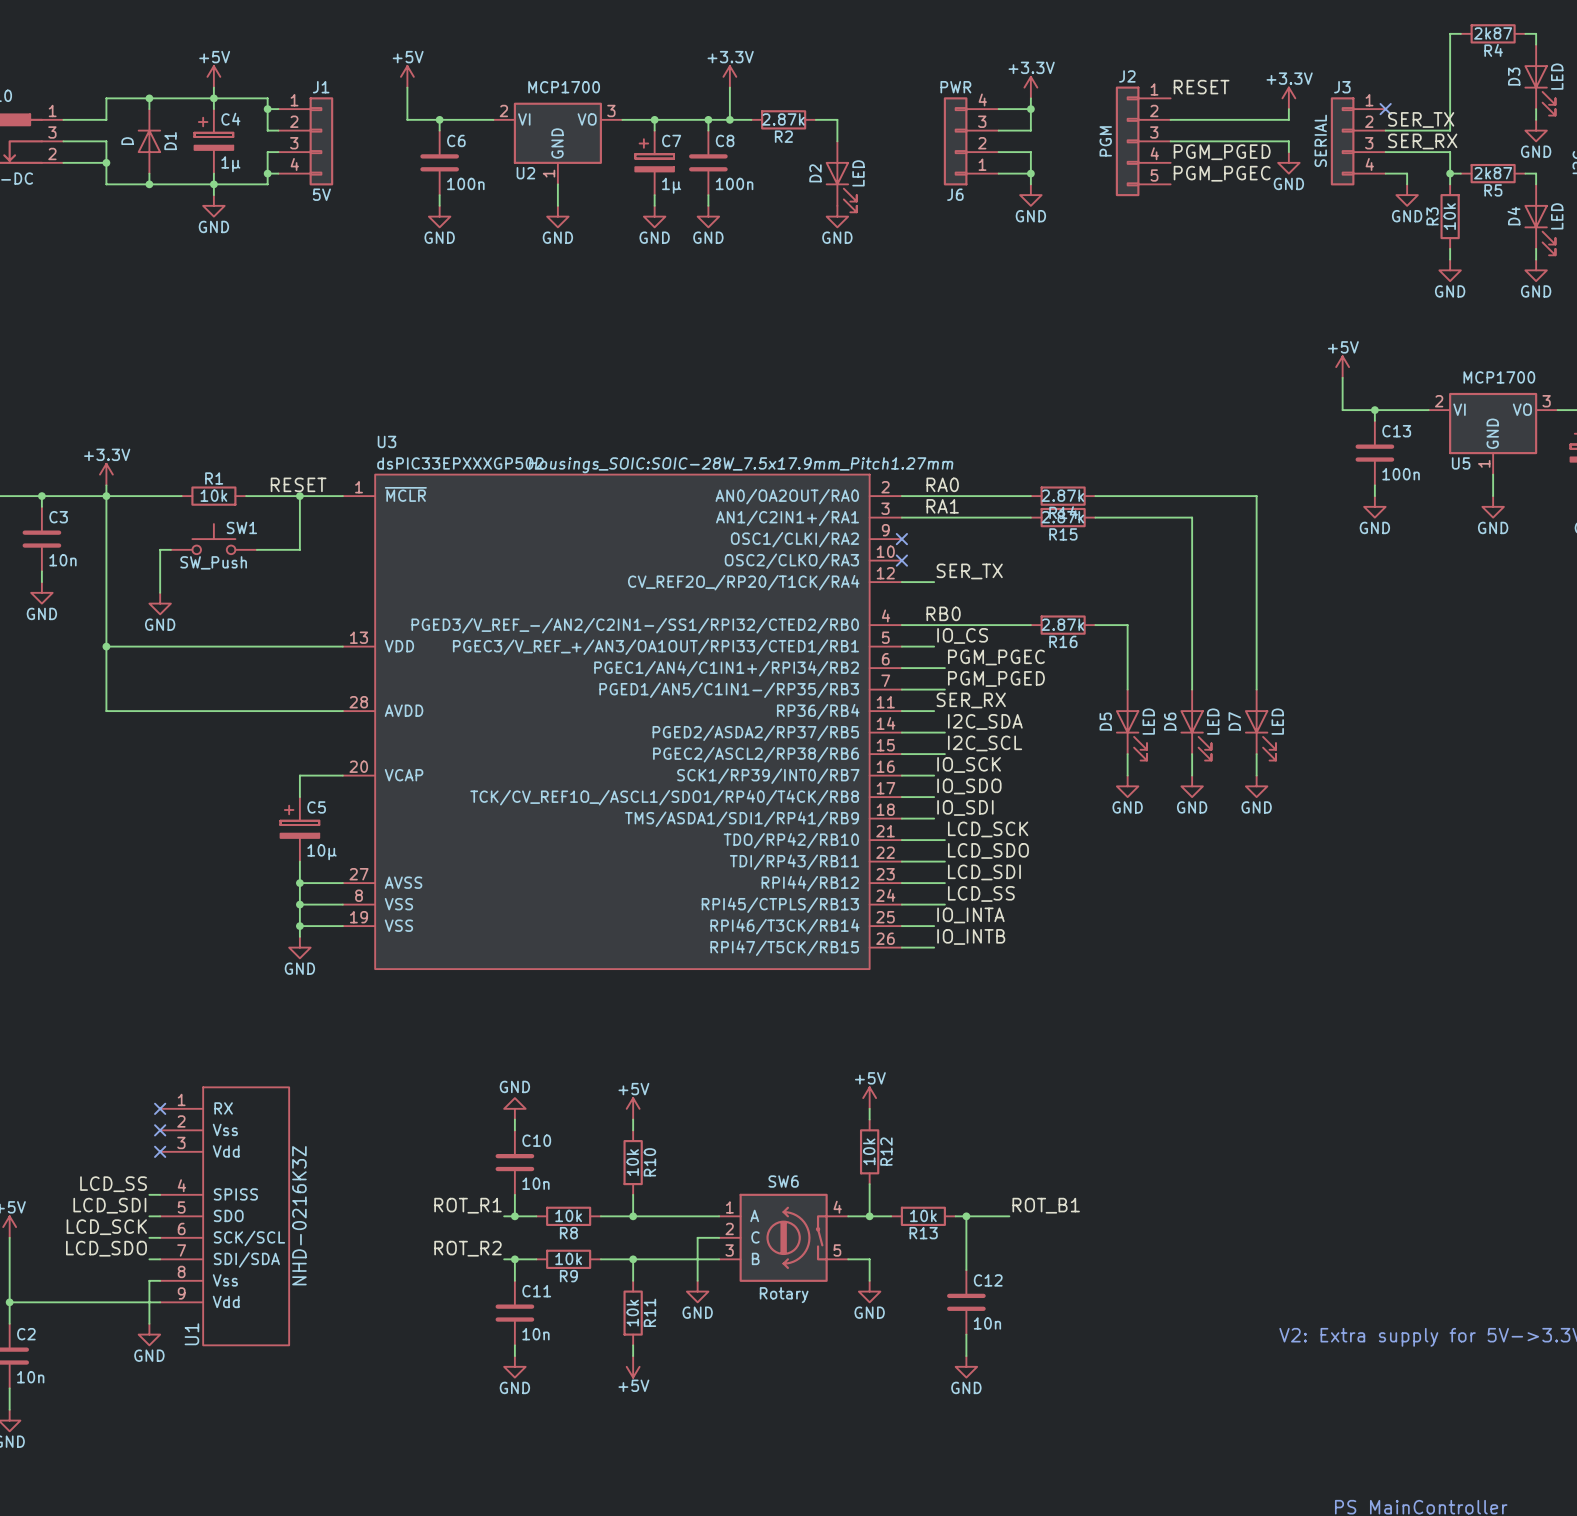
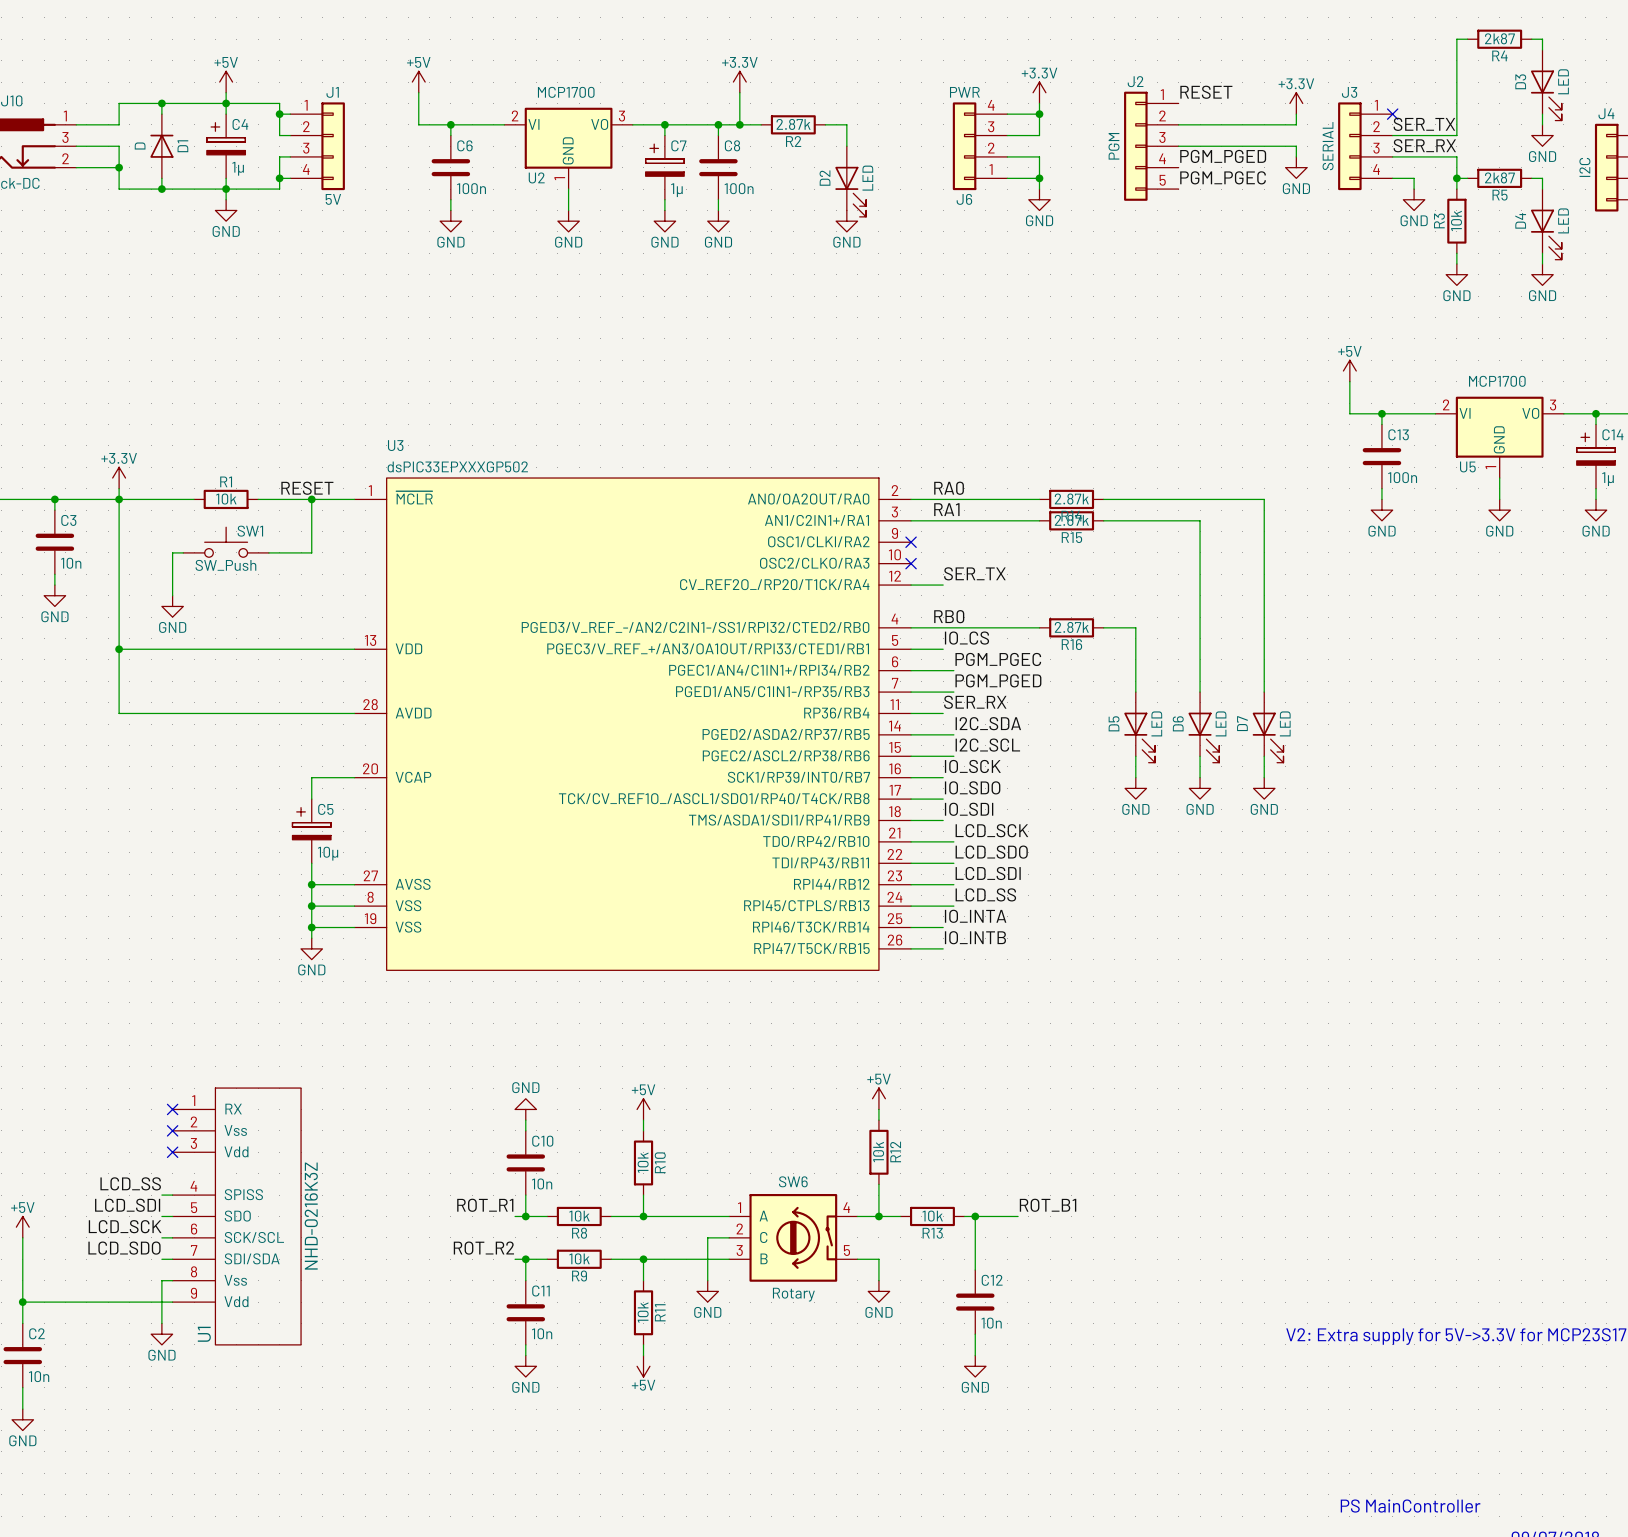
U3 text: Housings_SOIC:SOIC-28W_7.5x17.9mm_Pitch1.27mm (740, 465) -> none

